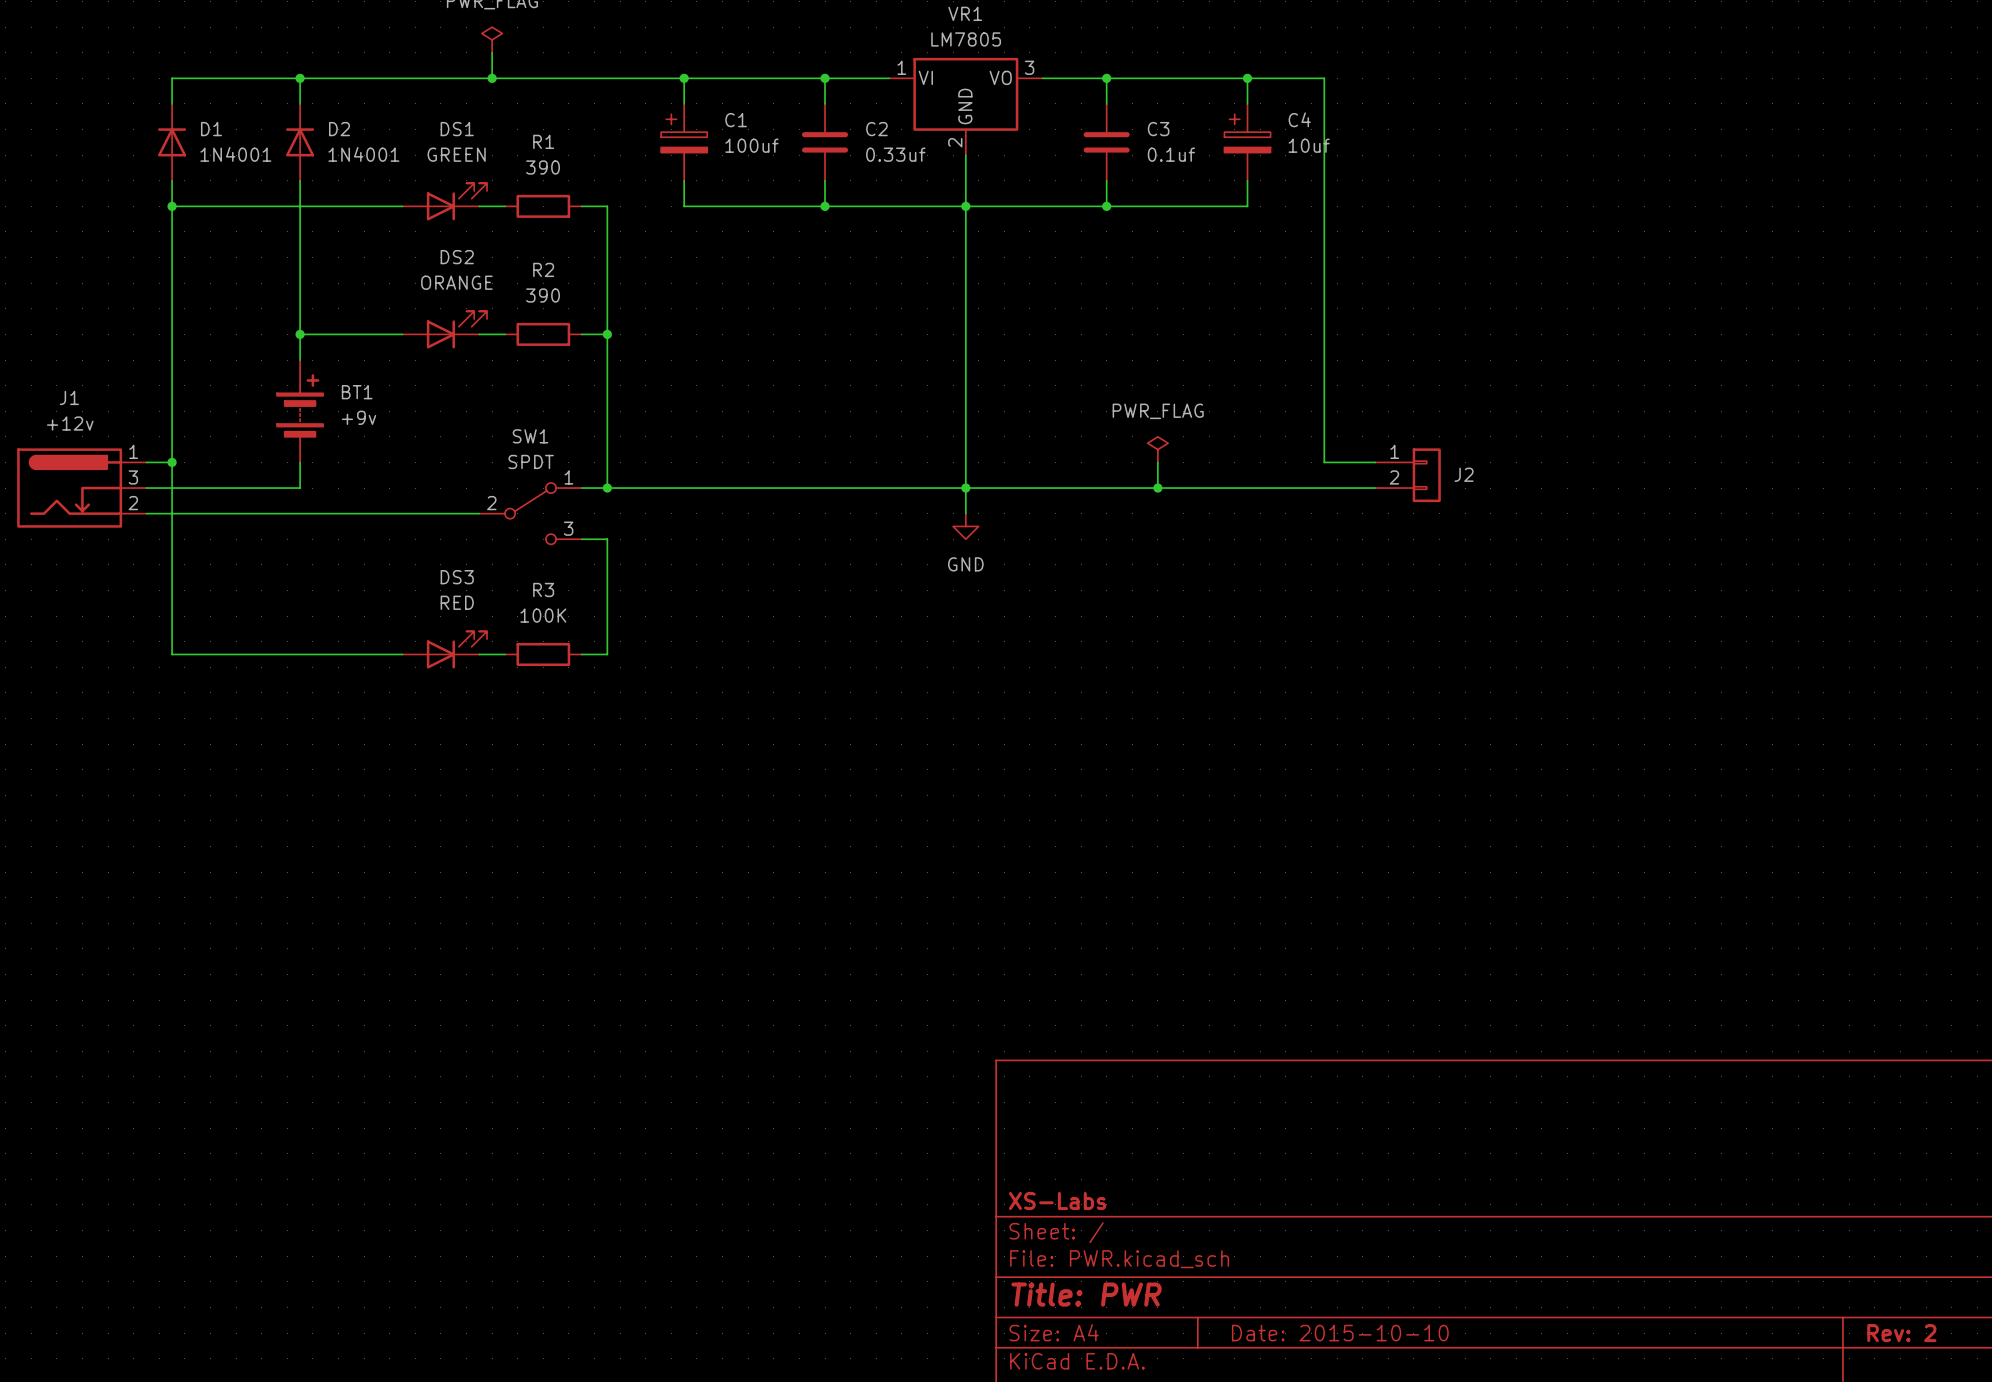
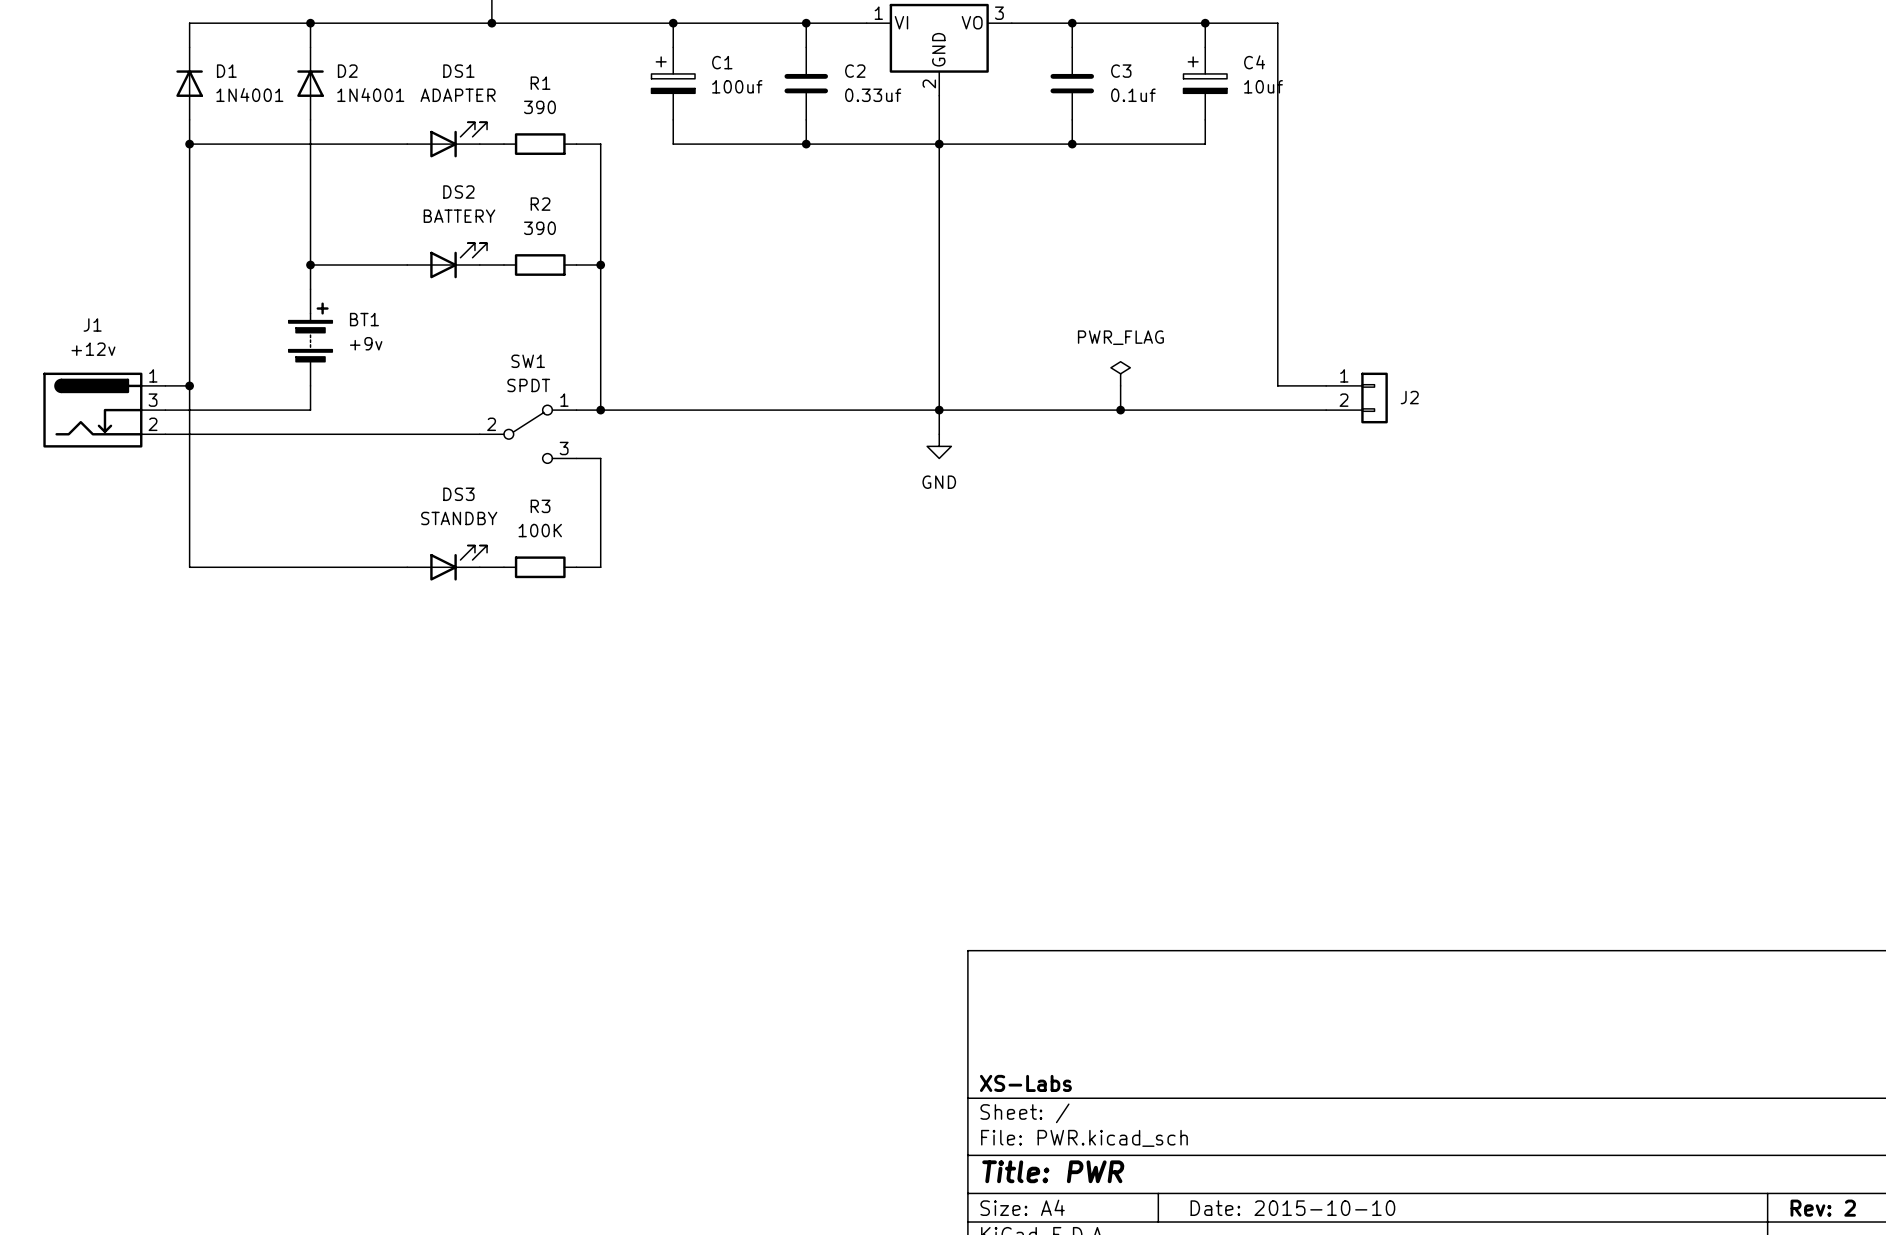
DS1 value: GREEN (456, 154) -> ADAPTER (458, 95)
DS2 value: ORANGE (456, 282) -> BATTERY (459, 216)
DS3 value: RED (457, 602) -> STANDBY (459, 518)

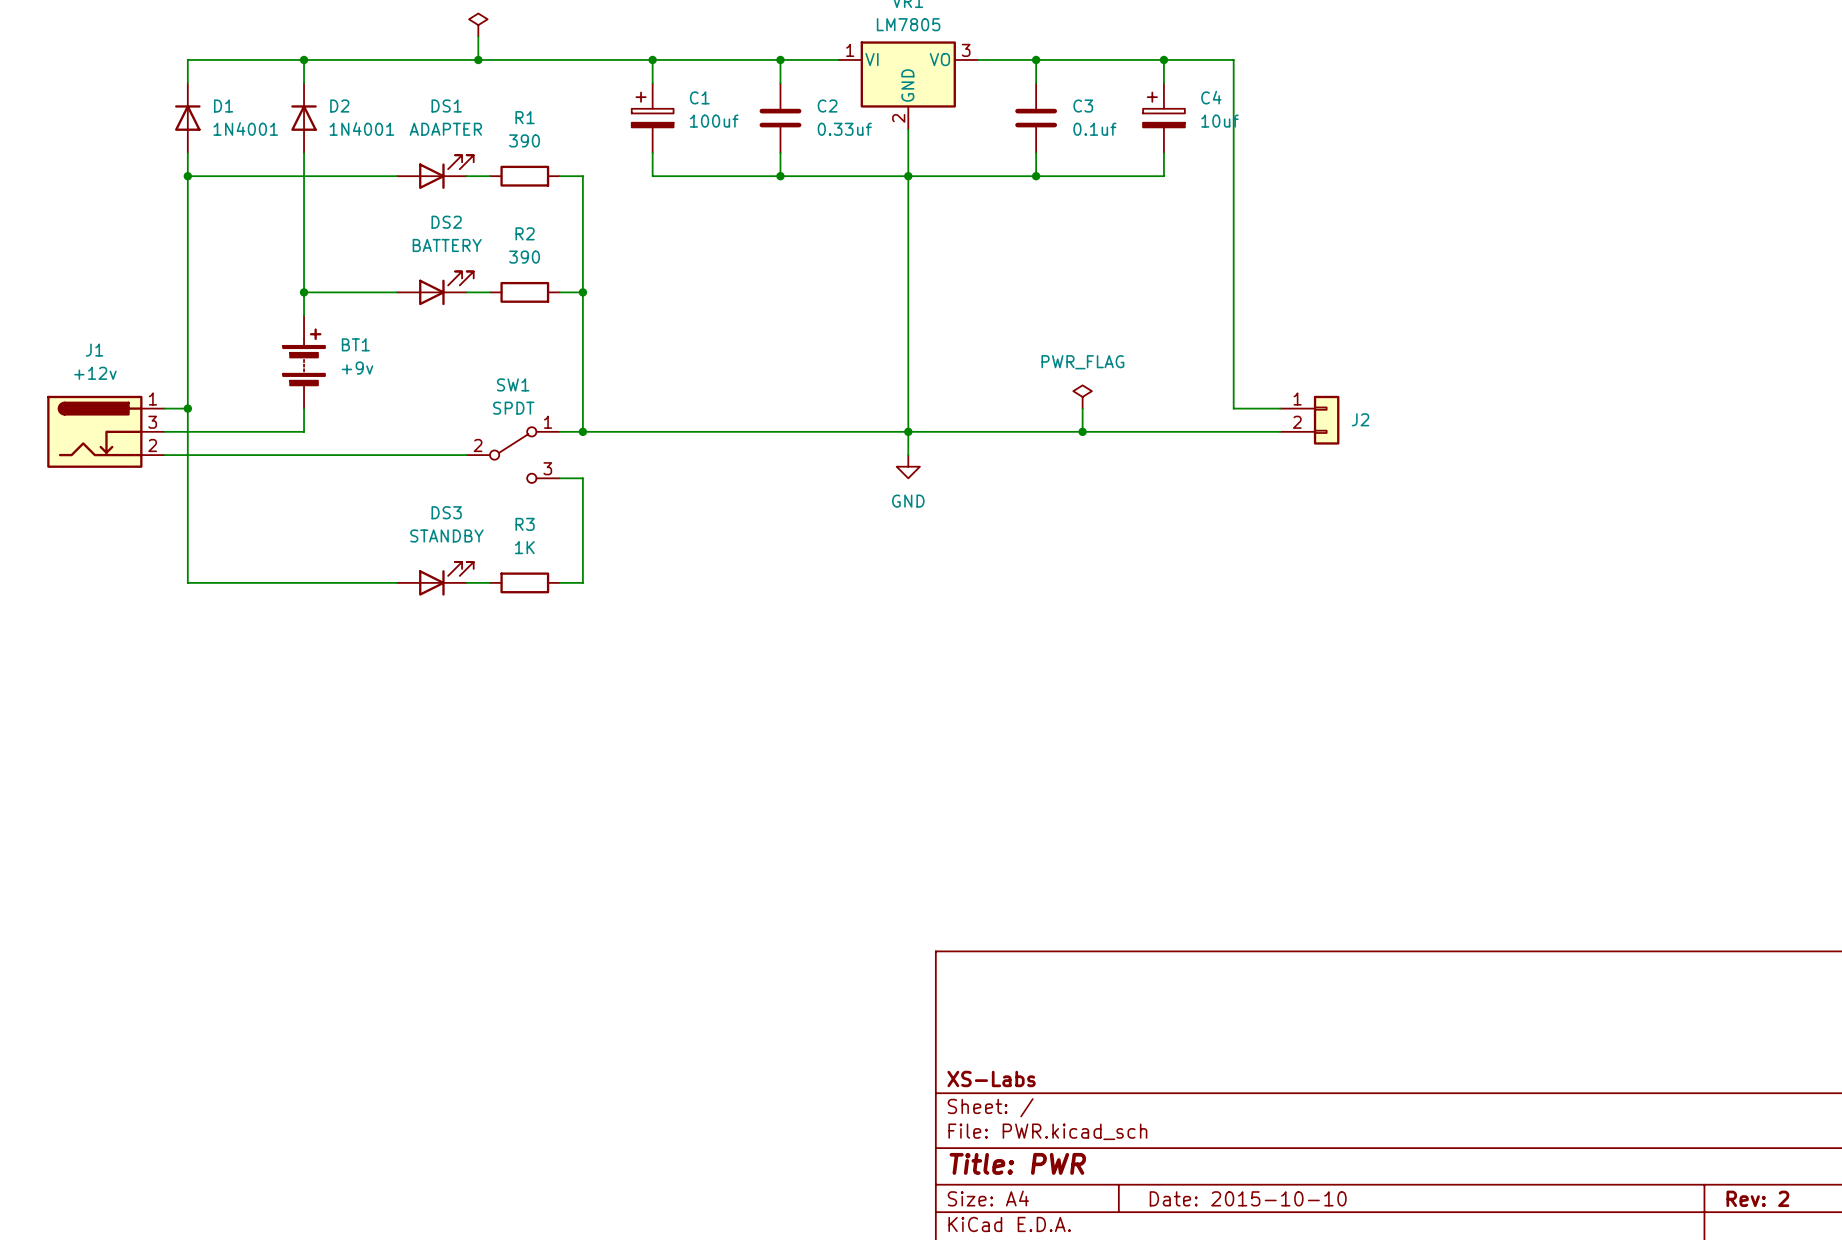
R3 value: 100K (540, 530) -> 1K (524, 547)

